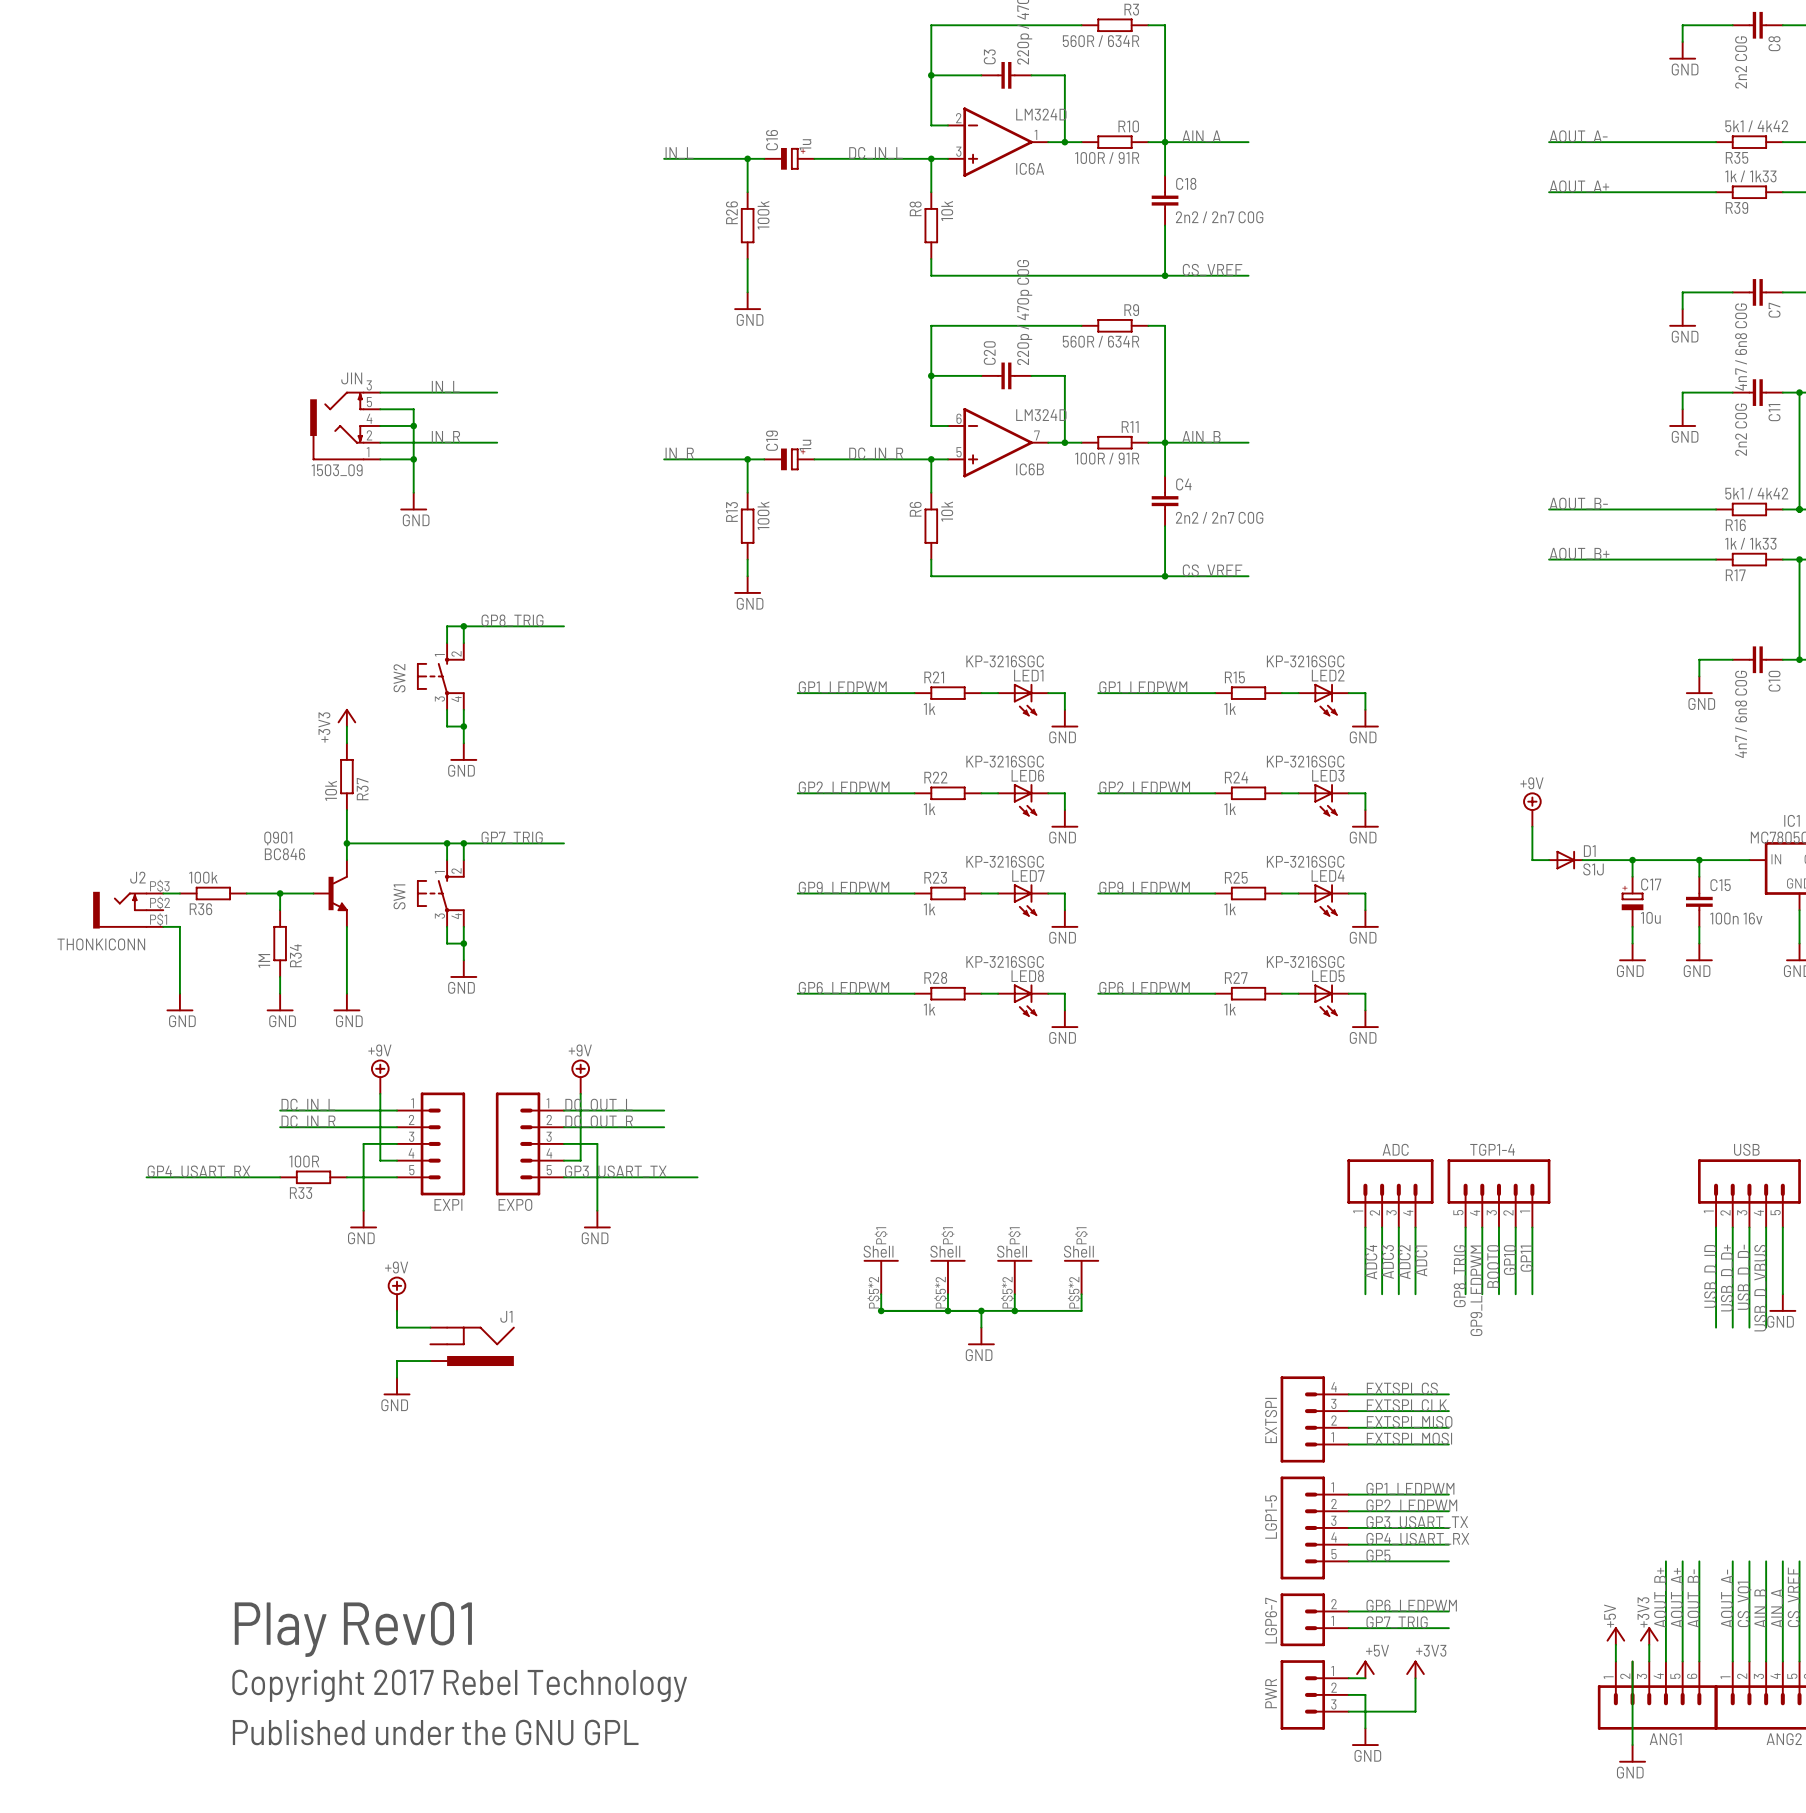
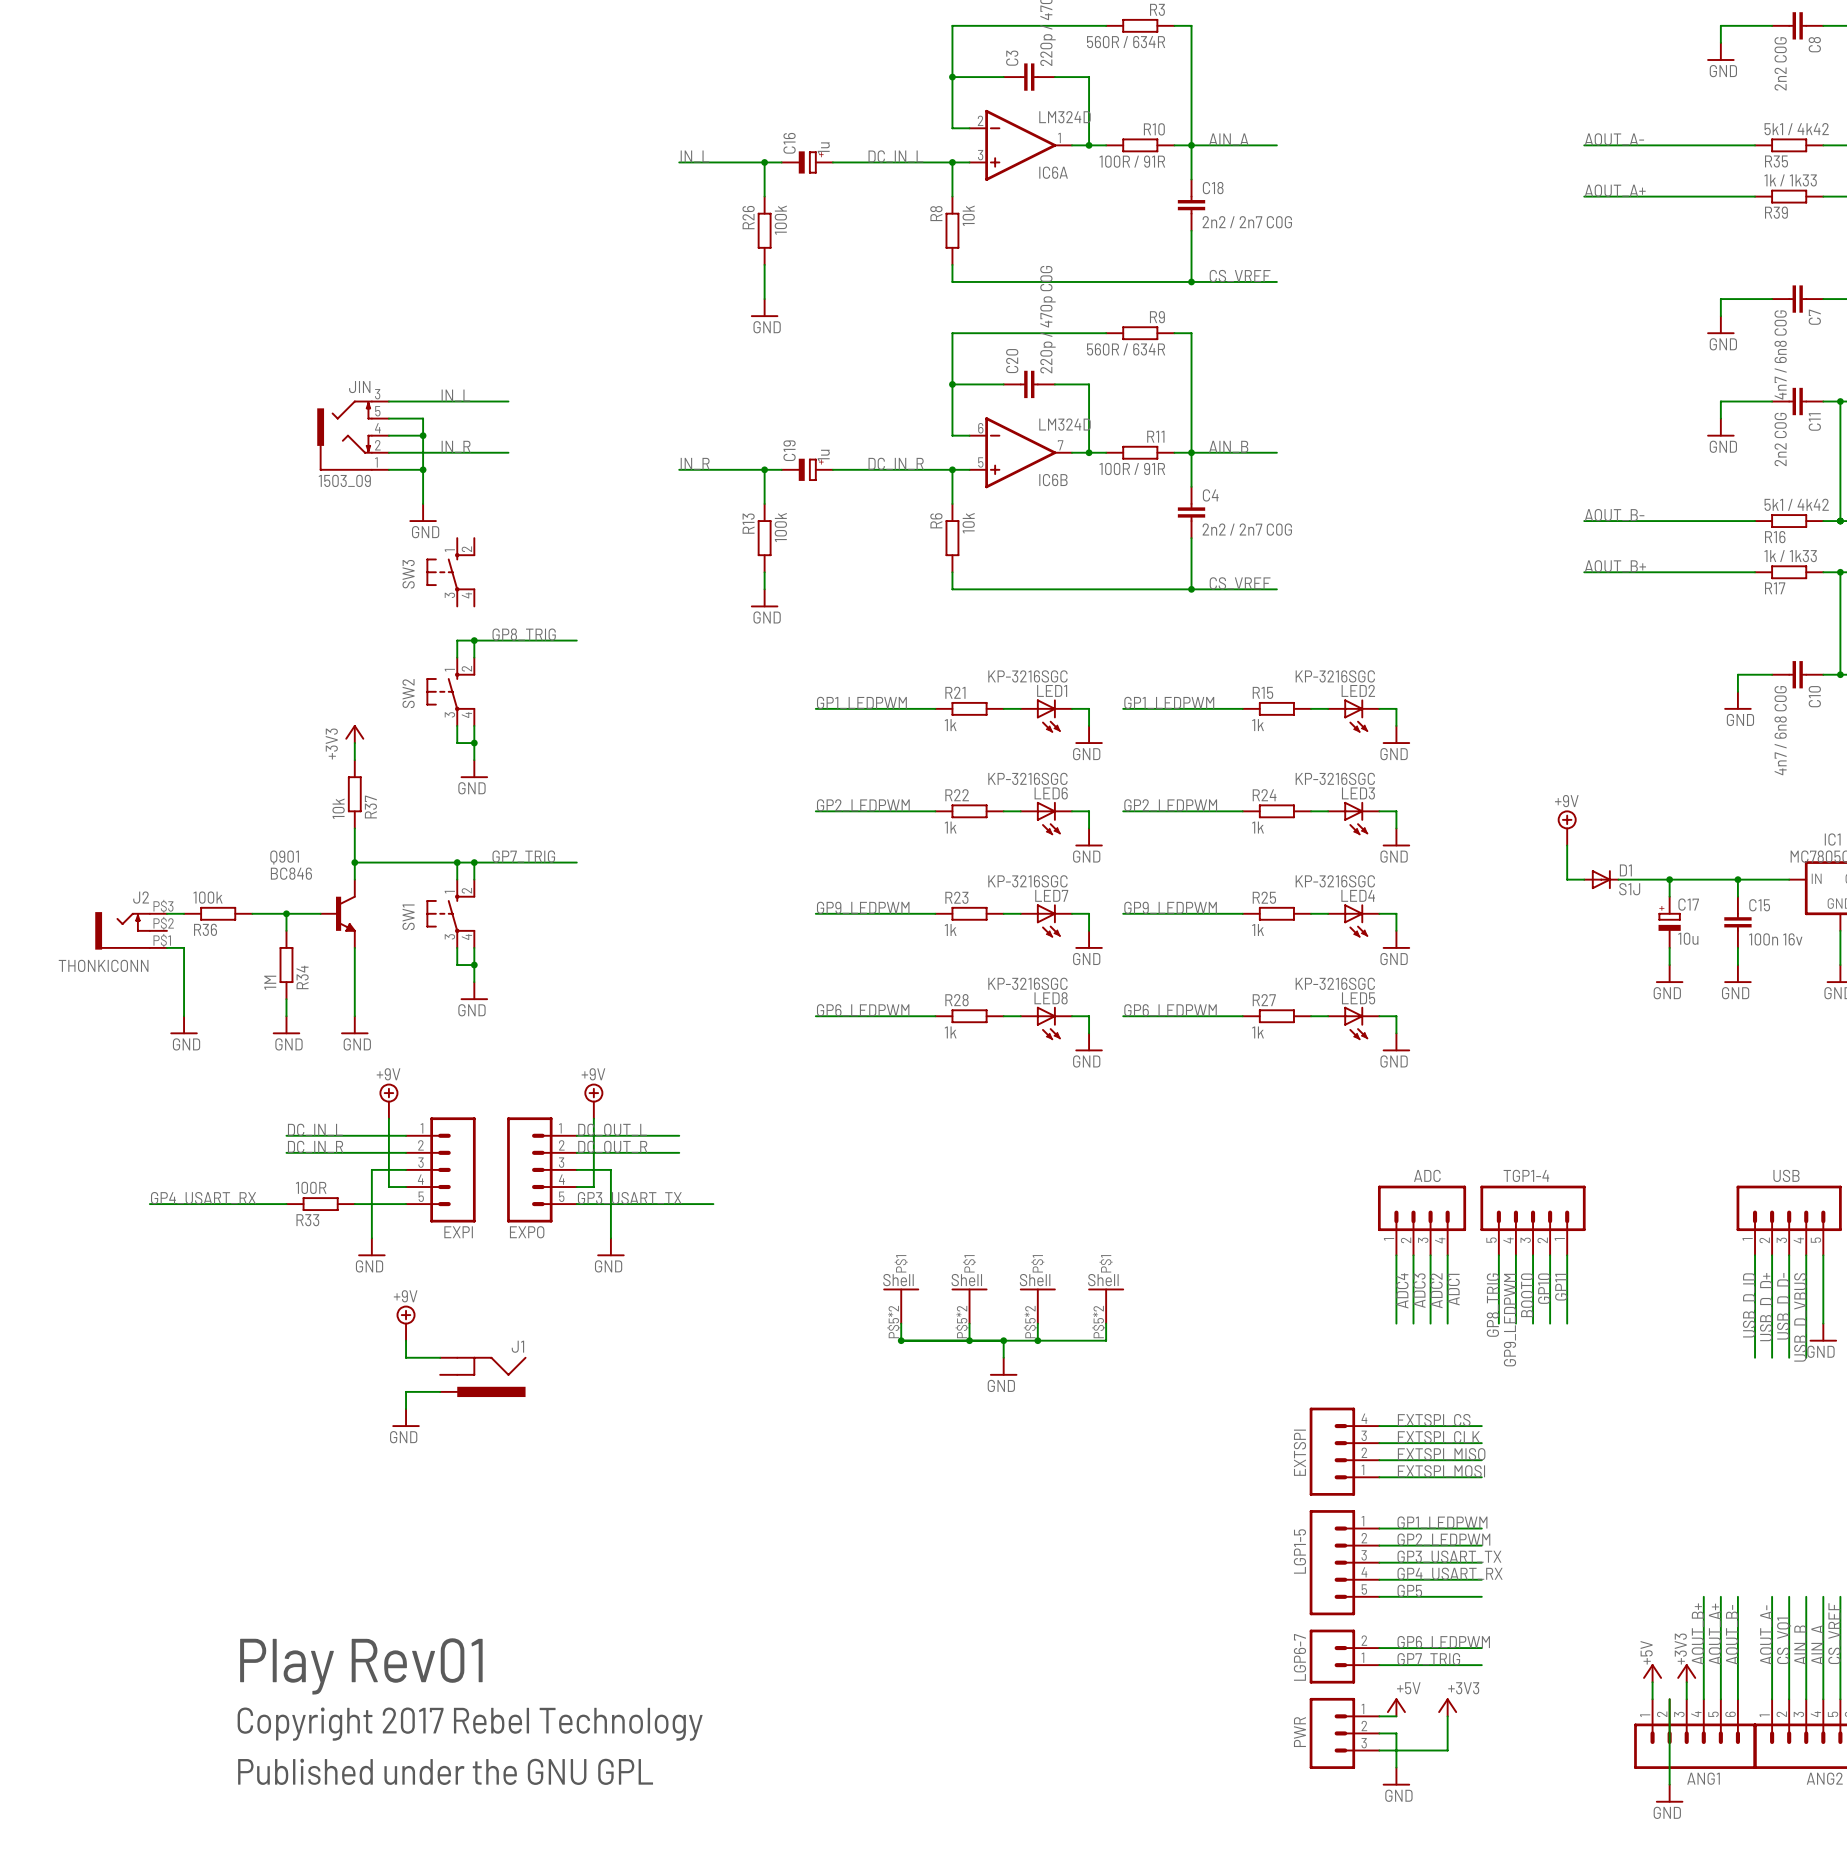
SW3: none -> (450, 572)

